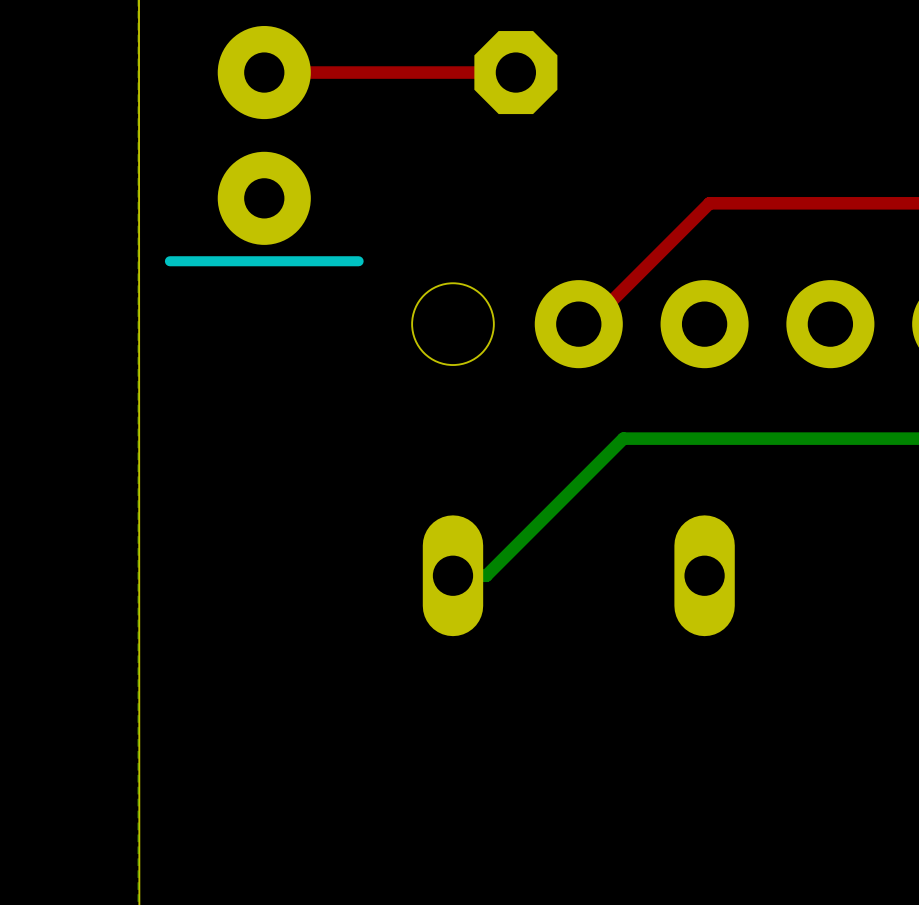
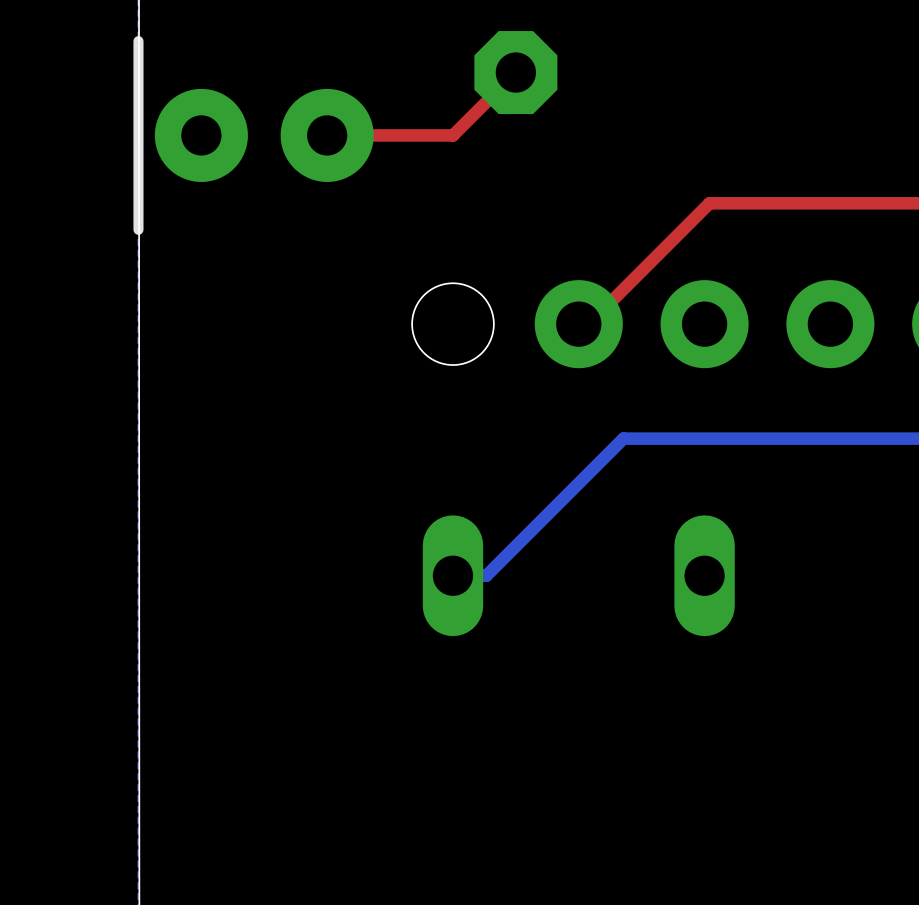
top track: (515, 72) (264, 72) -> (515, 72) (452, 135) (327, 135)
part rotation: 0° (264, 146) -> 90° clockwise (253, 135)

